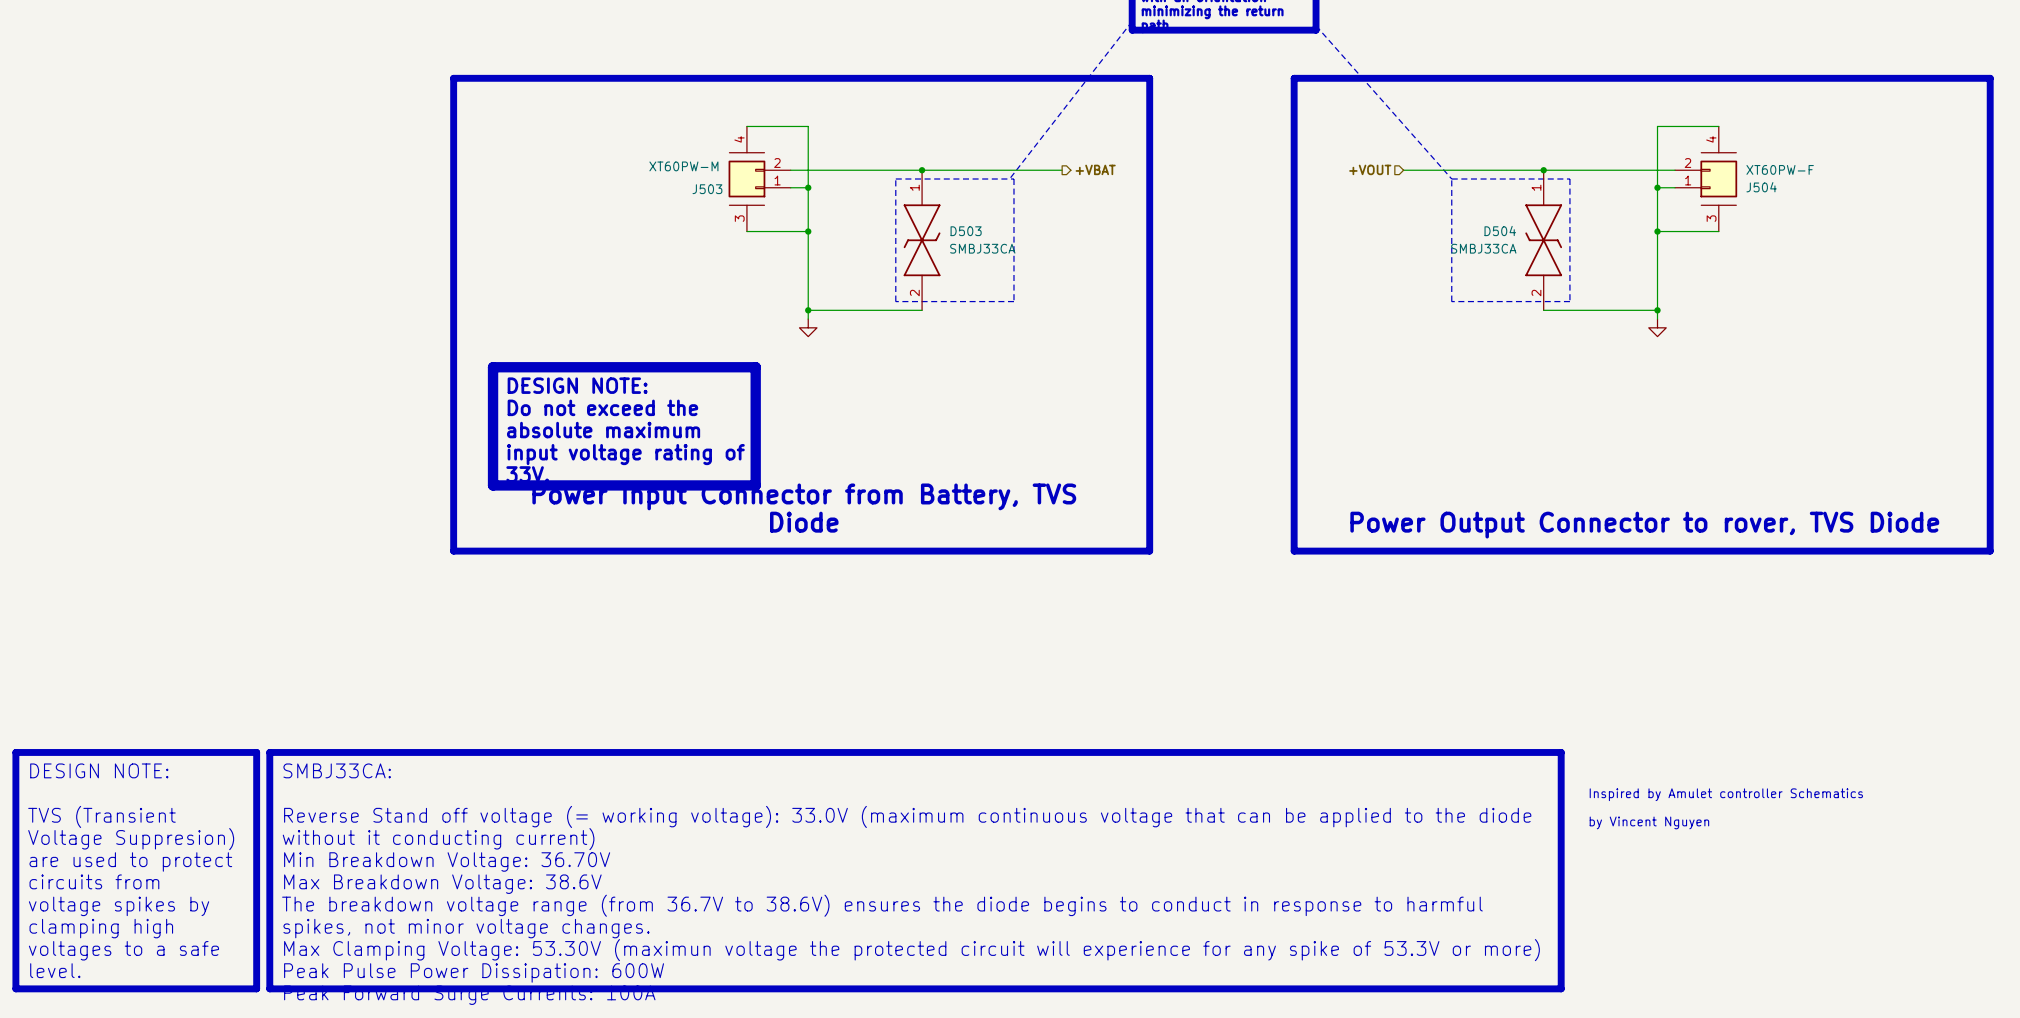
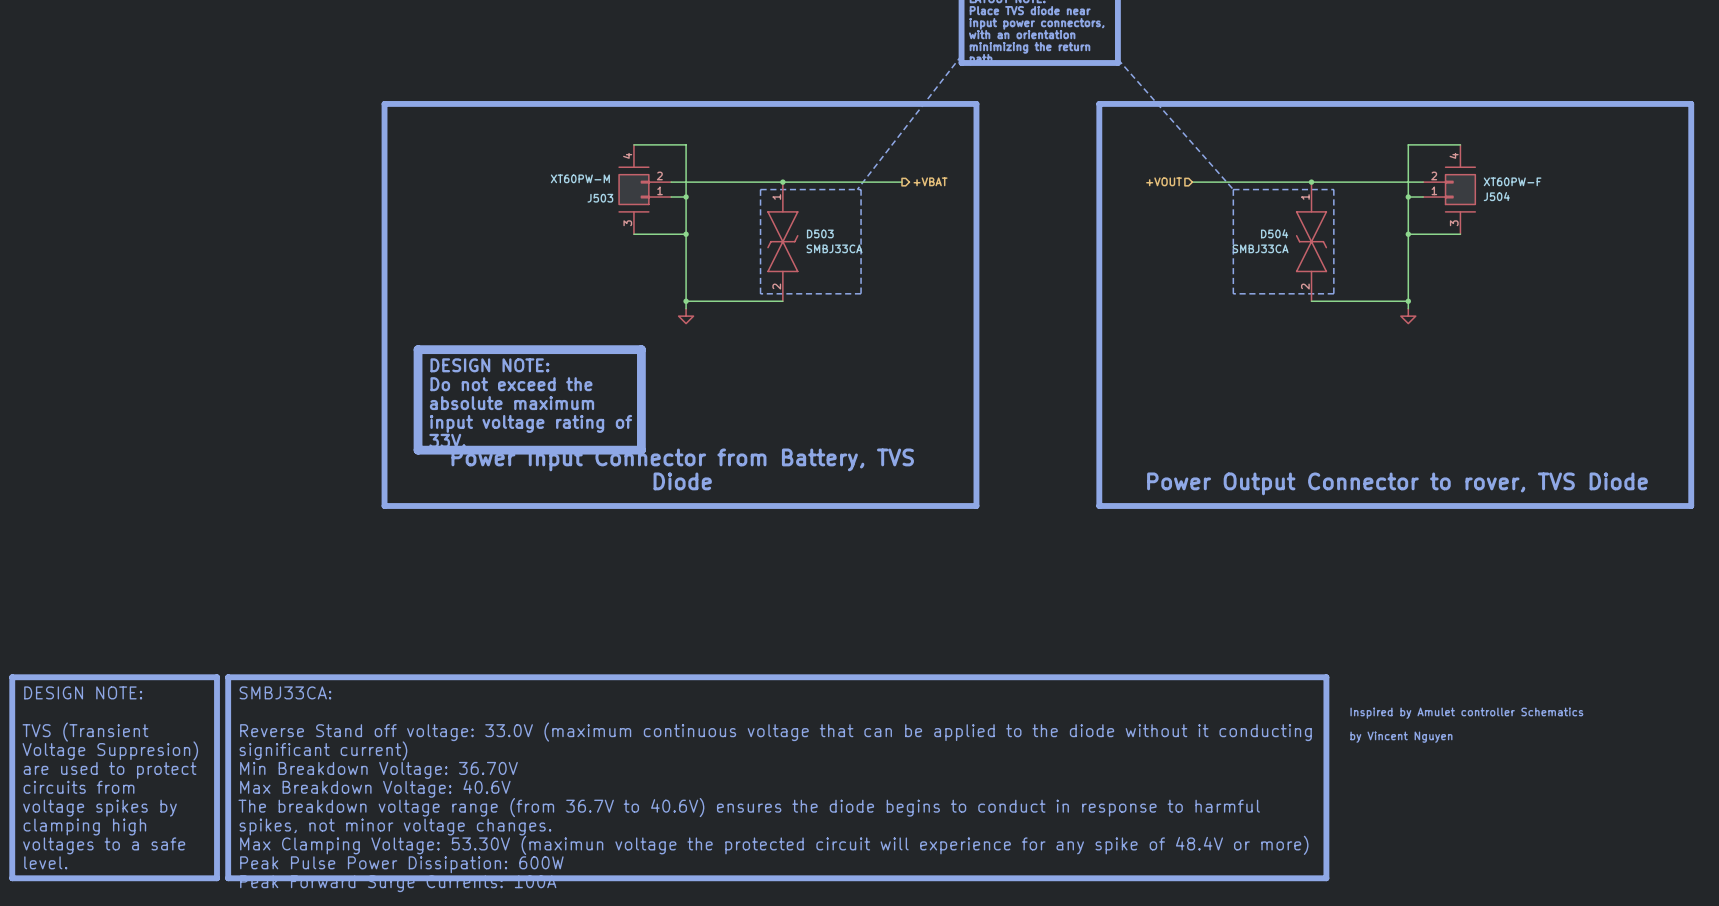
text: Reverse Stand off voltage (= working voltage): 33.0V (maximum continuous voltage that can be applied to the diode (907, 816) -> Reverse Stand off voltage: 33.0V (maximum continuous voltage that can be applied to the diode without it conducting (775, 732)
text: without it conducting current) (438, 839) -> significant current) (323, 750)
text: Max Breakdown Voltage: 38.6V (442, 884) -> Max Breakdown Voltage: 40.6V (375, 788)
text: The breakdown voltage range (from 36.7V to 38.6V) ensures the diode begins to conduct in response to harmful (882, 905) -> The breakdown voltage range (from 36.7V to 40.6V) ensures the diode begins to conduct in response to harmful (749, 807)
text: Max Clamping Voltage: 53.30V (maximun voltage the protected circuit will experience for any spike of 53.3V or more) (911, 950) -> Max Clamping Voltage: 53.30V (maximun voltage the protected circuit will experience for any spike of 48.4V or more) (774, 845)

